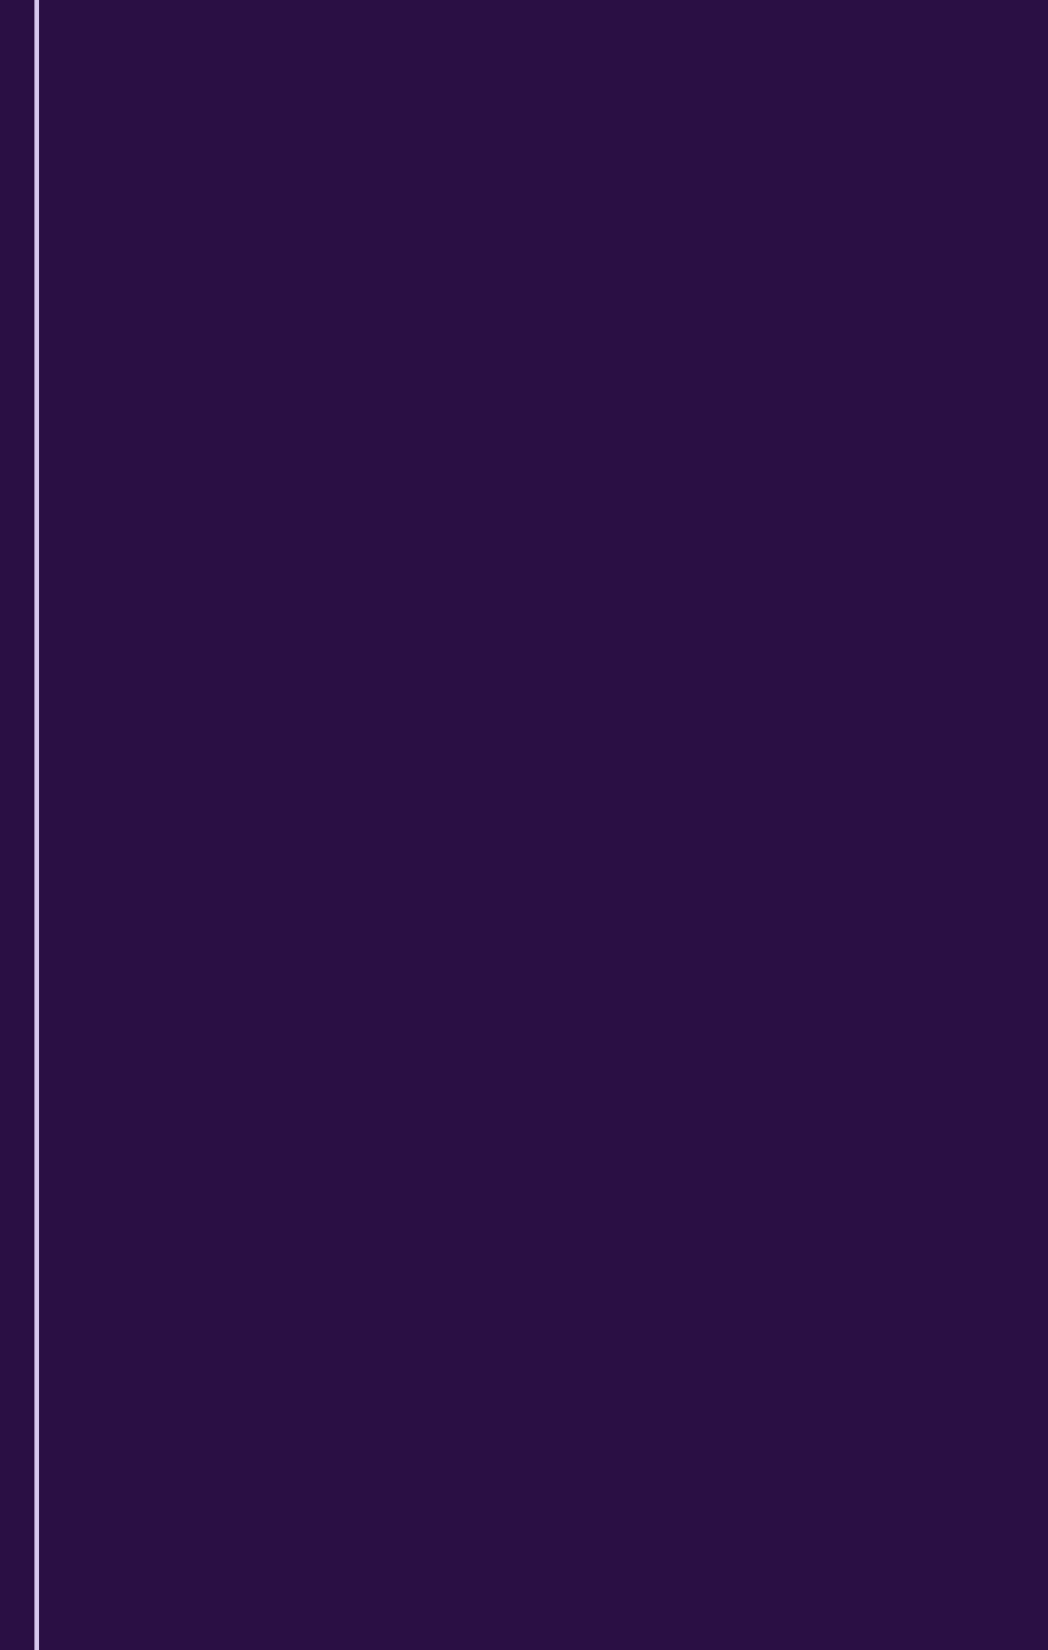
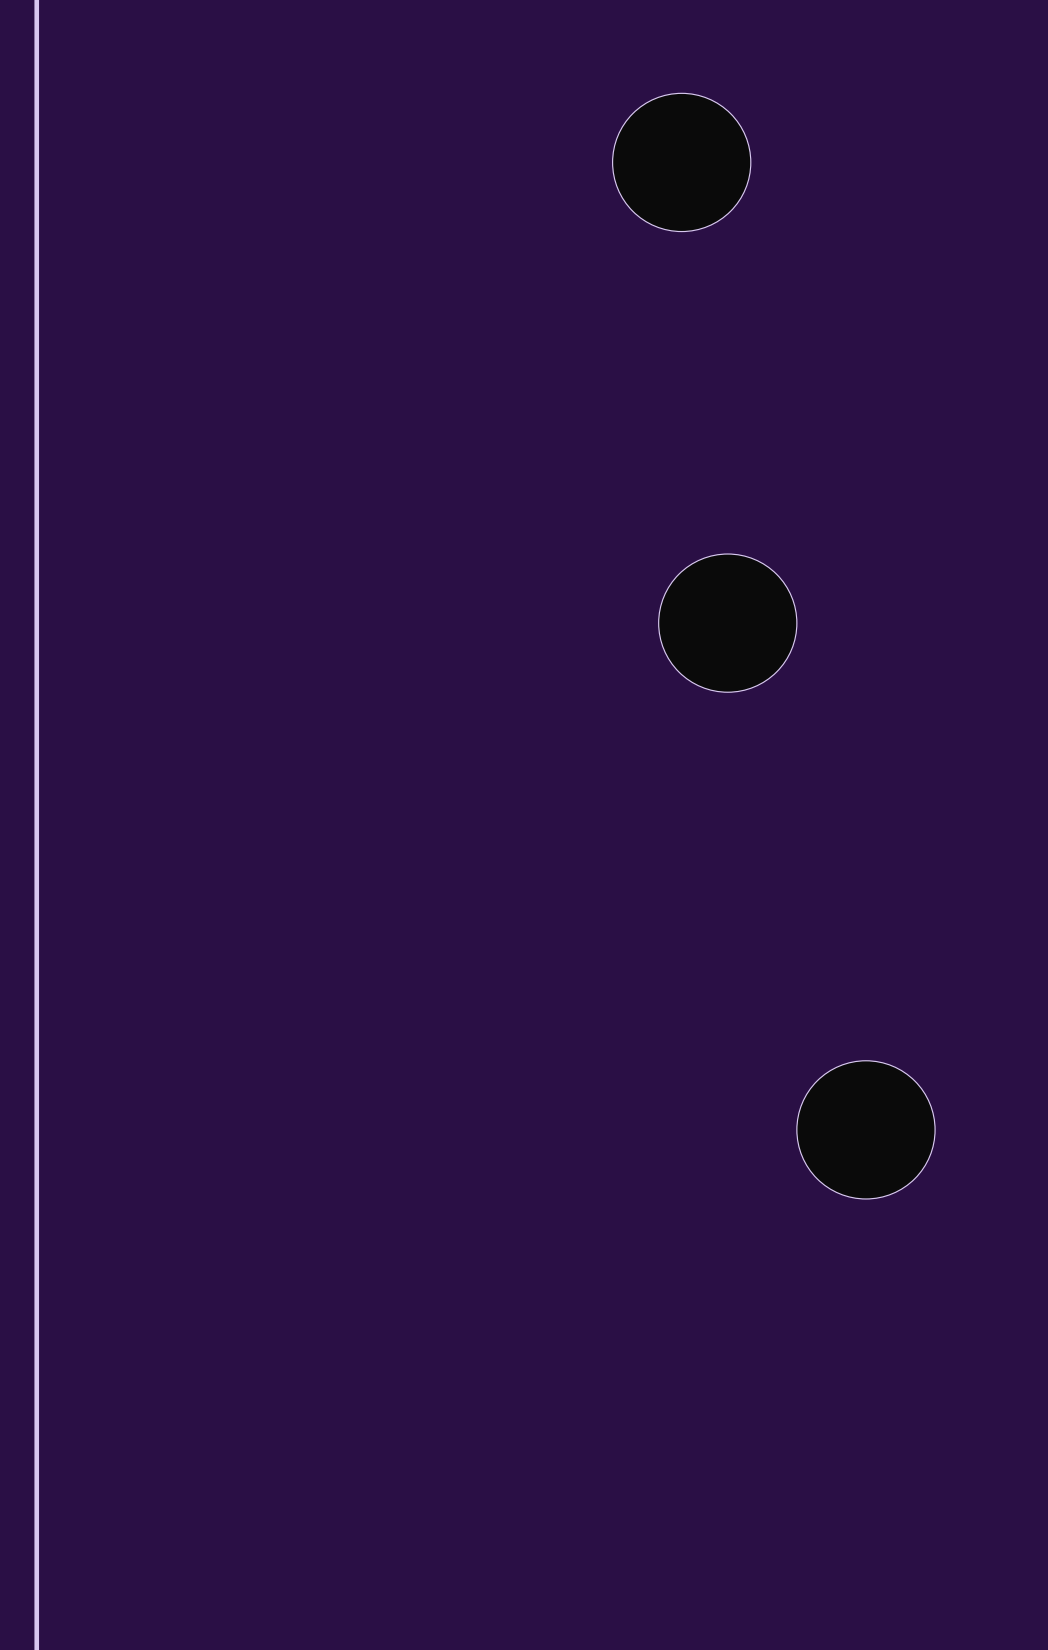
part: none -> (681, 162)
part: none -> (727, 623)
part: none -> (865, 1129)

